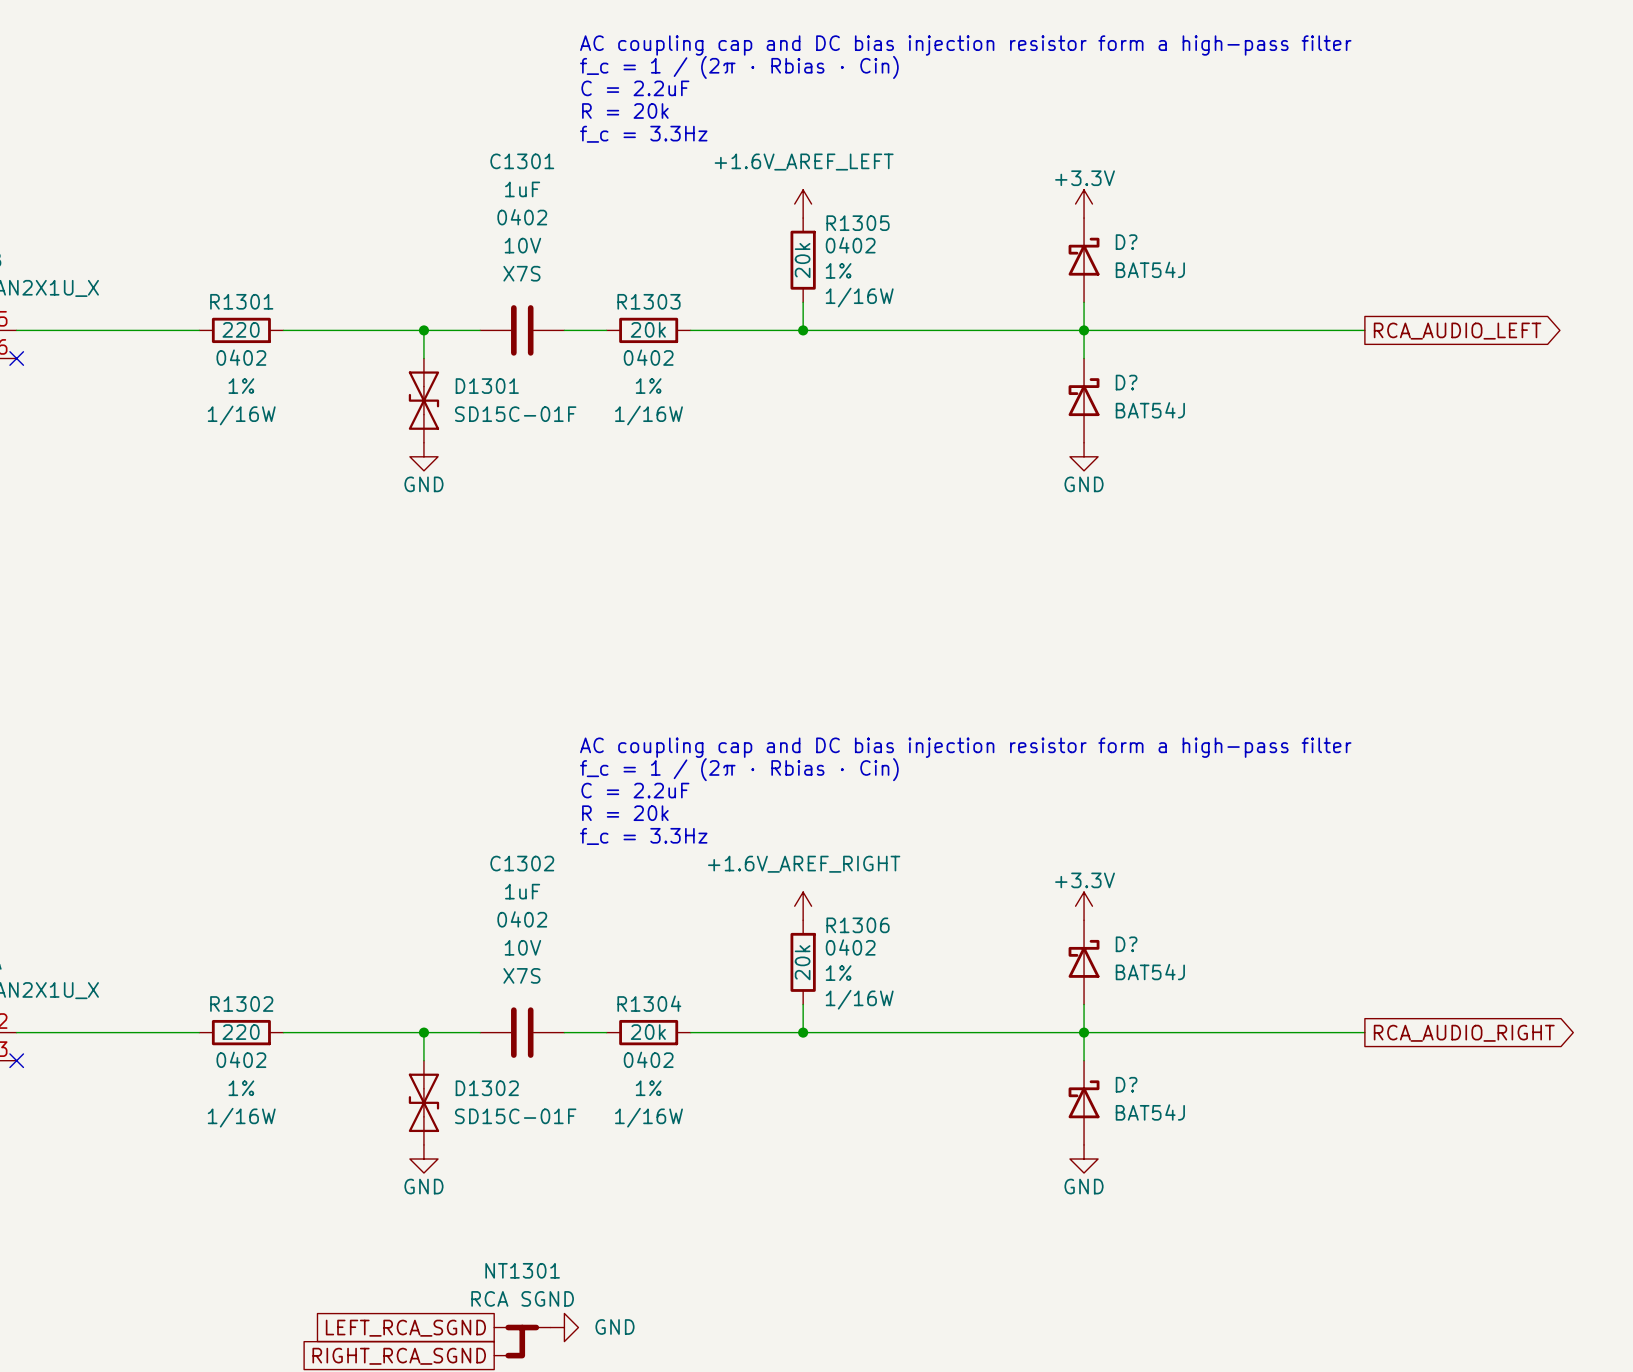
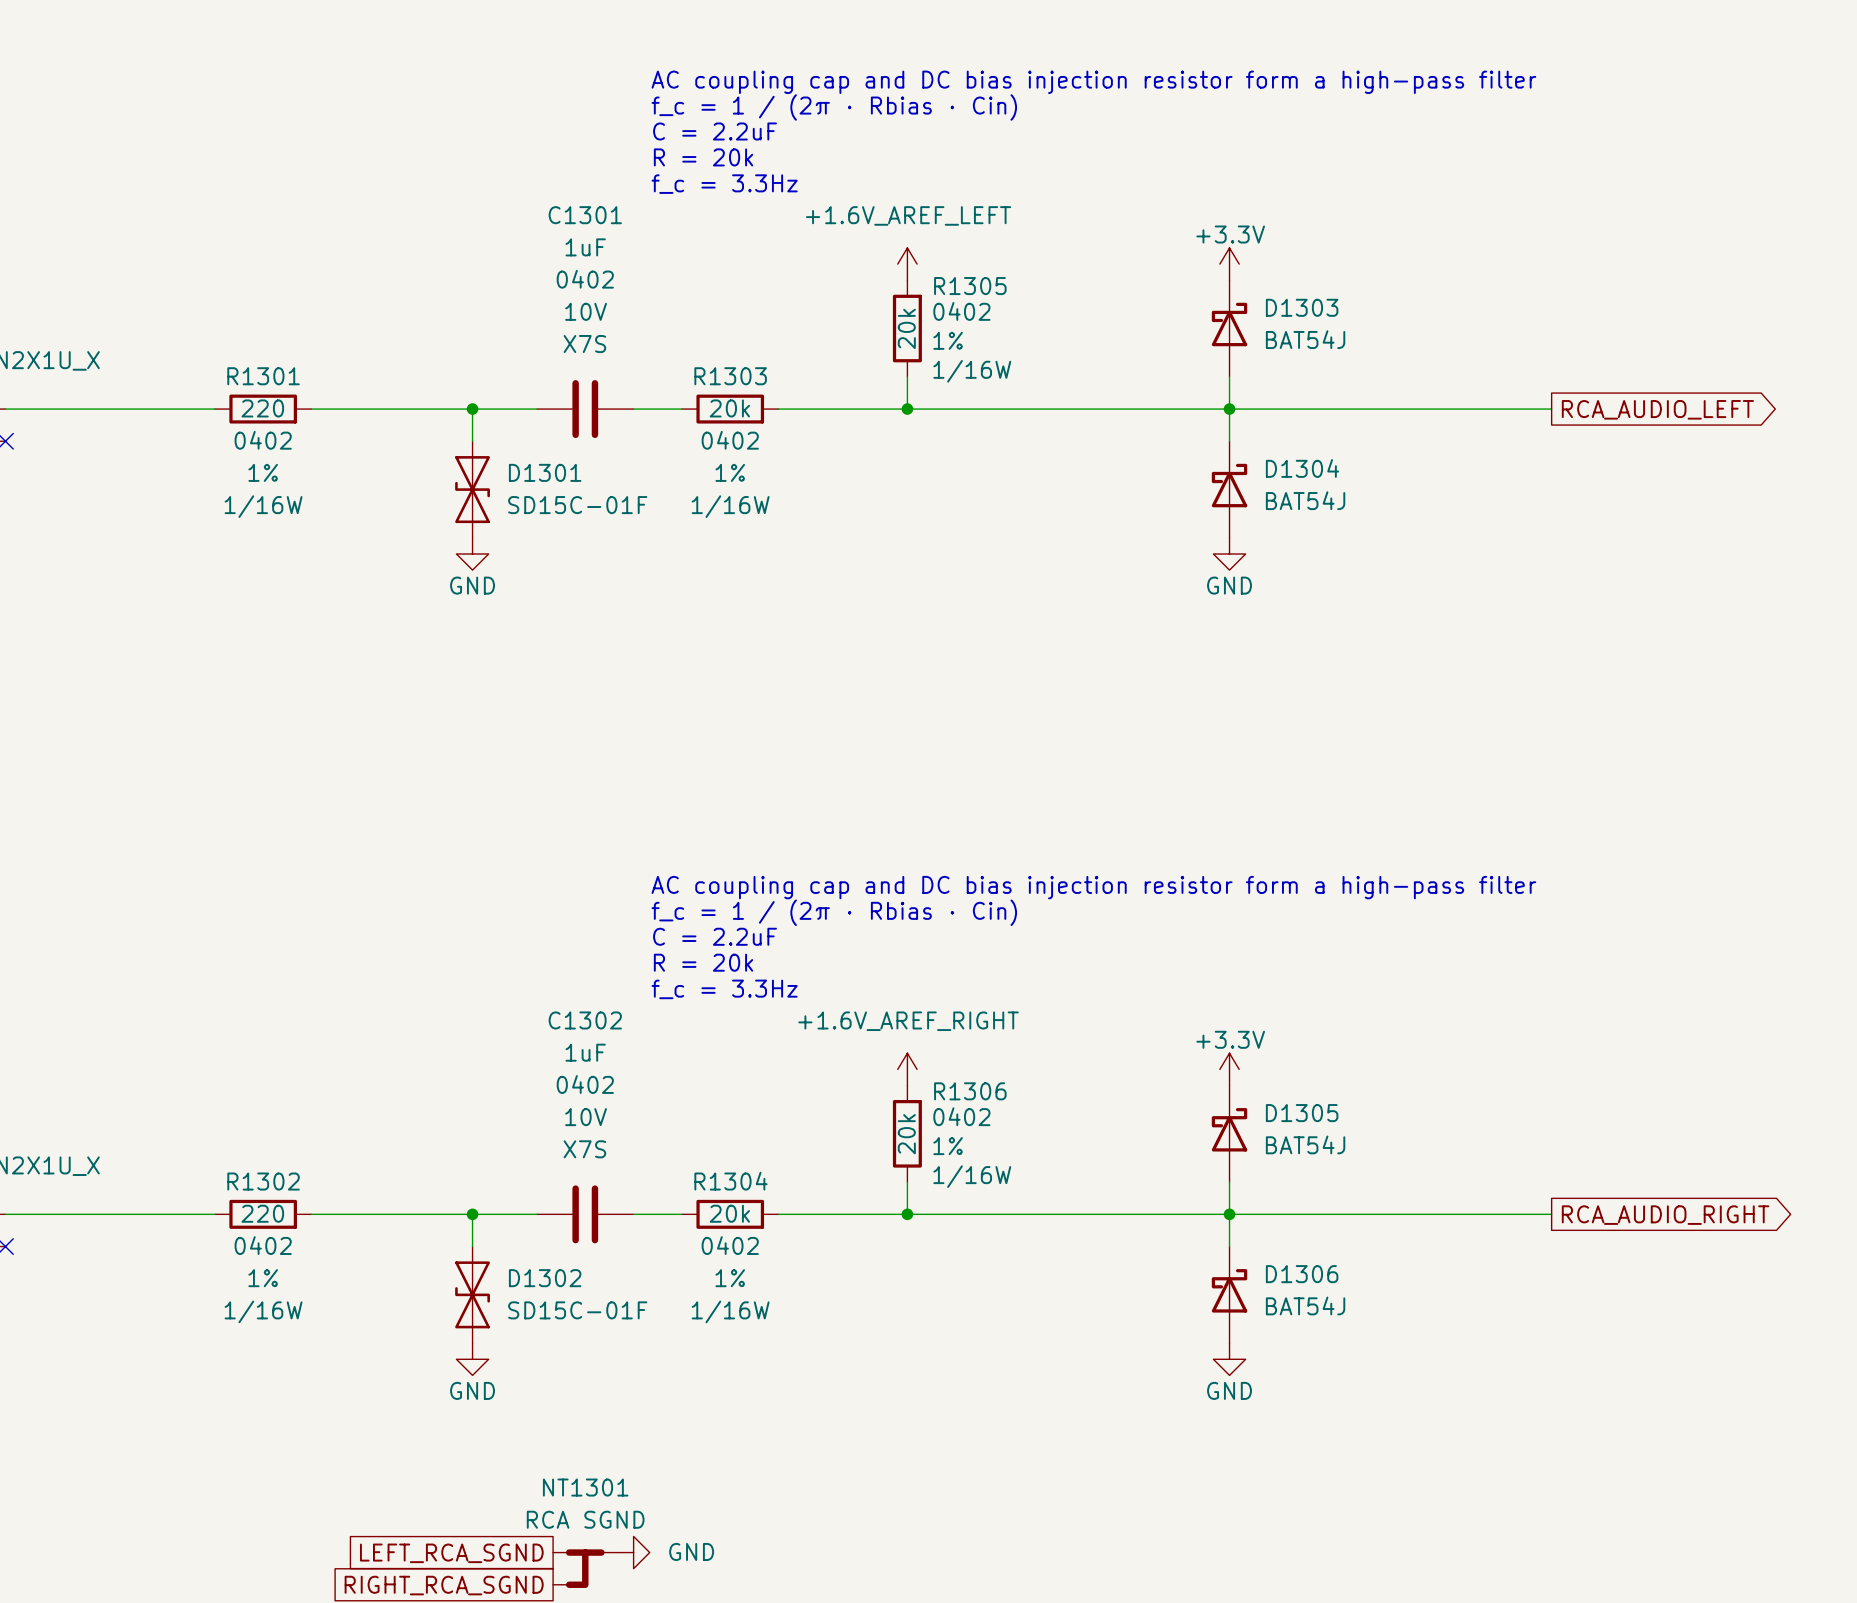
D? name: D? (1126, 242) -> D1303 (1302, 307)
D? name: D? (1126, 382) -> D1304 (1302, 468)
D? name: D? (1126, 944) -> D1305 (1302, 1113)
D? name: D? (1126, 1084) -> D1306 (1302, 1274)

